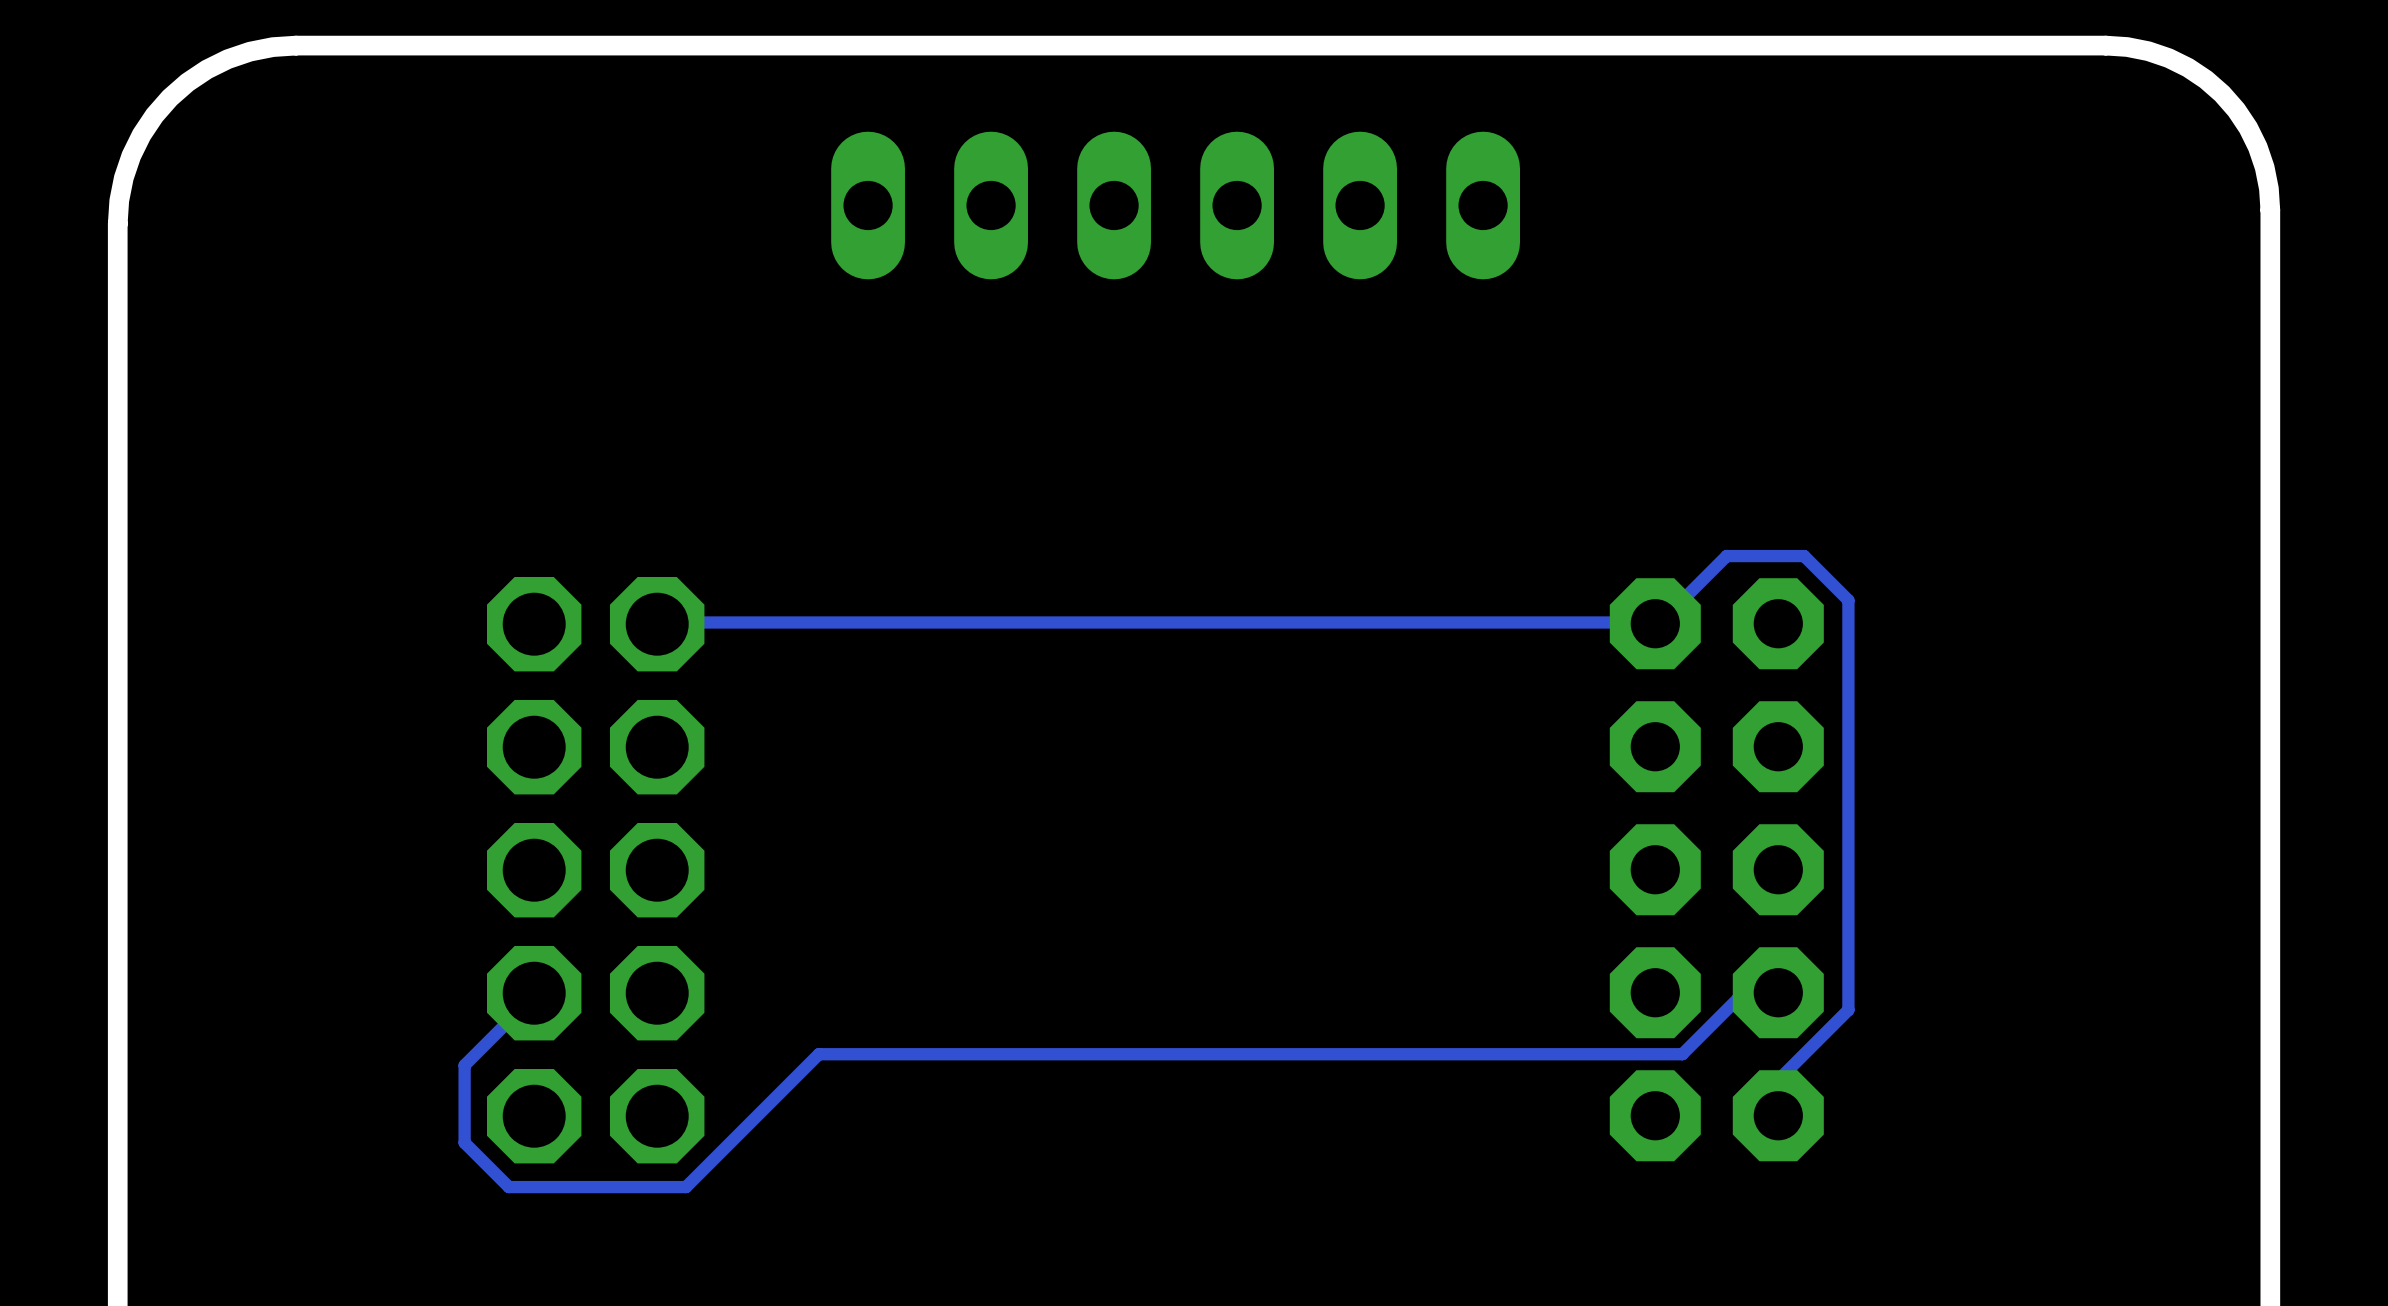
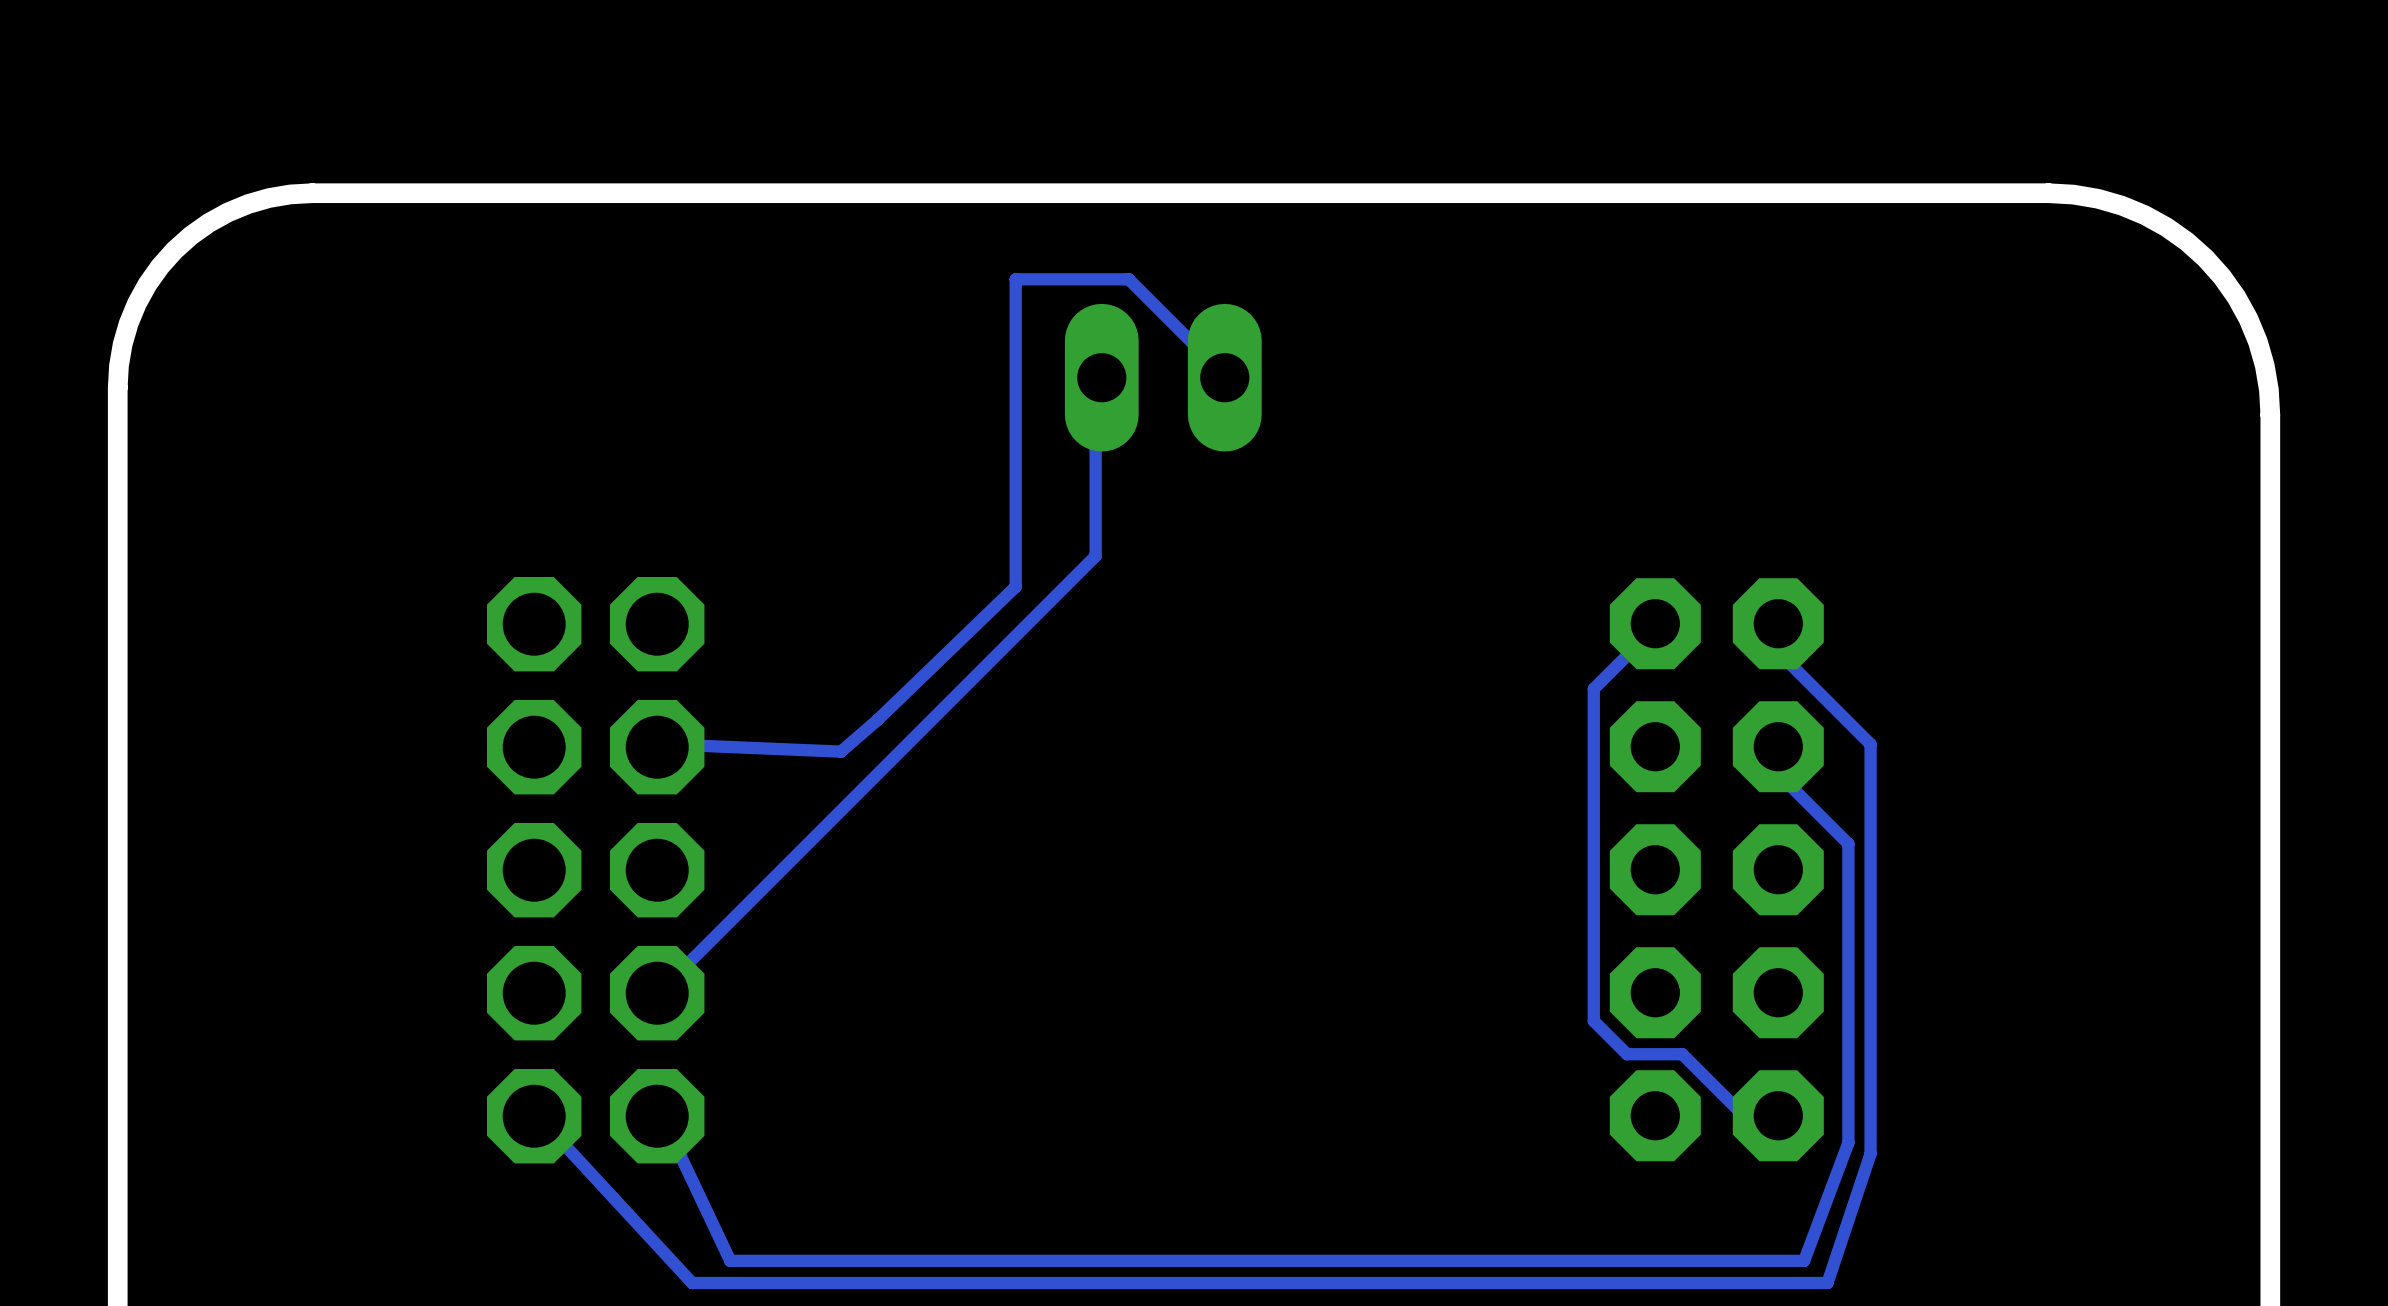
part: (1175, 205) -> none
track: none -> (1101, 377) (1095, 378) (1095, 556) (657, 993)
part: none -> (1163, 377)
track: none -> (1224, 377) (1217, 367) (1128, 279) (1015, 279) (1015, 586) (877, 719) (841, 751) (663, 744) (657, 747)
board edge: (117, 387) (117, 223) (119, 200) (123, 177) (131, 155) (141, 134) (154, 115) (169, 97) (187, 82) (206, 69) (227, 59) (249, 51) (272, 47) (296, 45) (2105, 45) (2148, 51) (2188, 67) (2205, 79) (2236, 109) (2257, 147) (2264, 167) (2270, 210) (2270, 414) -> (117, 387) (122, 344) (128, 323) (137, 303) (160, 266) (190, 235) (227, 212) (268, 198) (290, 194) (2048, 193) (2097, 198) (2144, 215) (2166, 227) (2205, 258) (2236, 296) (2248, 318) (2264, 365) (2270, 414)
track: none -> (1778, 623) (1782, 633) (1782, 655) (1870, 744) (1870, 1153) (1827, 1283) (692, 1283) (542, 1120) (534, 1116)
track: (657, 624) (663, 622) (1655, 623) (1660, 622) (1726, 556) (1804, 556) (1848, 600) (1848, 843) -> (1778, 746) (1782, 755) (1782, 777) (1848, 843)
track: (1778, 992) (1770, 998) (1737, 998) (1682, 1054) -> (1778, 1115) (1770, 1109) (1737, 1109) (1682, 1054)
track: (534, 993) (531, 998) (464, 1065) (464, 1142) (508, 1187) (686, 1187) (818, 1054) (1627, 1054) -> (1655, 623) (1649, 633) (1593, 688) (1593, 1021) (1627, 1054)
track: (1848, 1009) (1782, 1076) (1782, 1109) (1778, 1115) -> (1848, 1009) (1848, 1142) (1804, 1260) (730, 1260) (663, 1120) (657, 1116)

